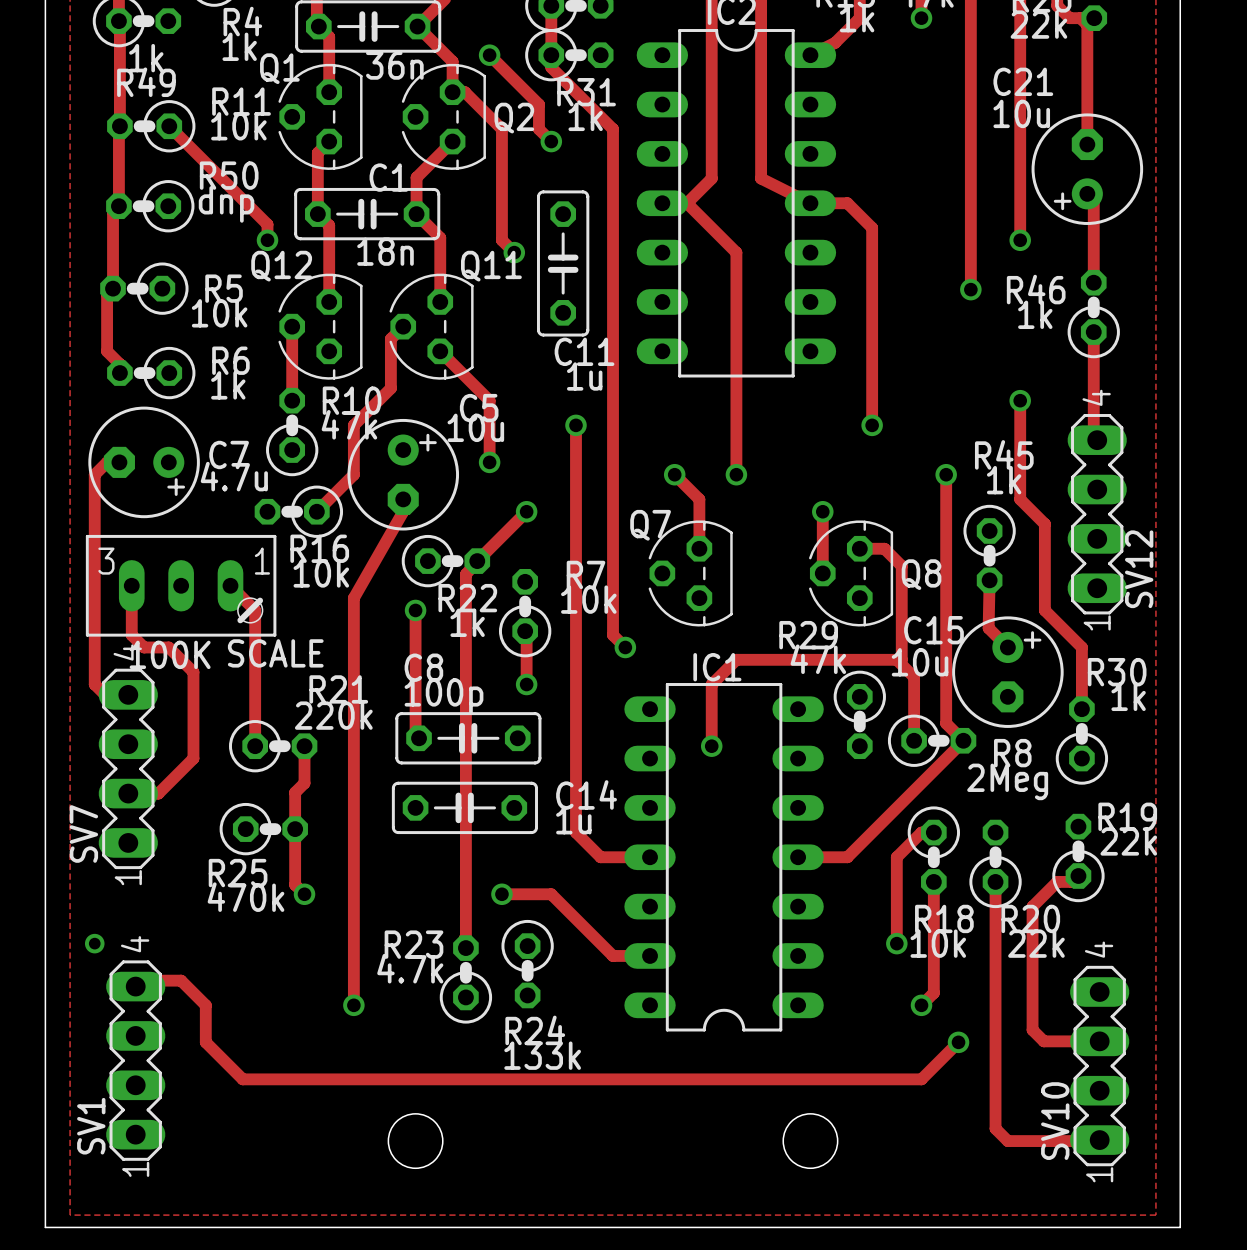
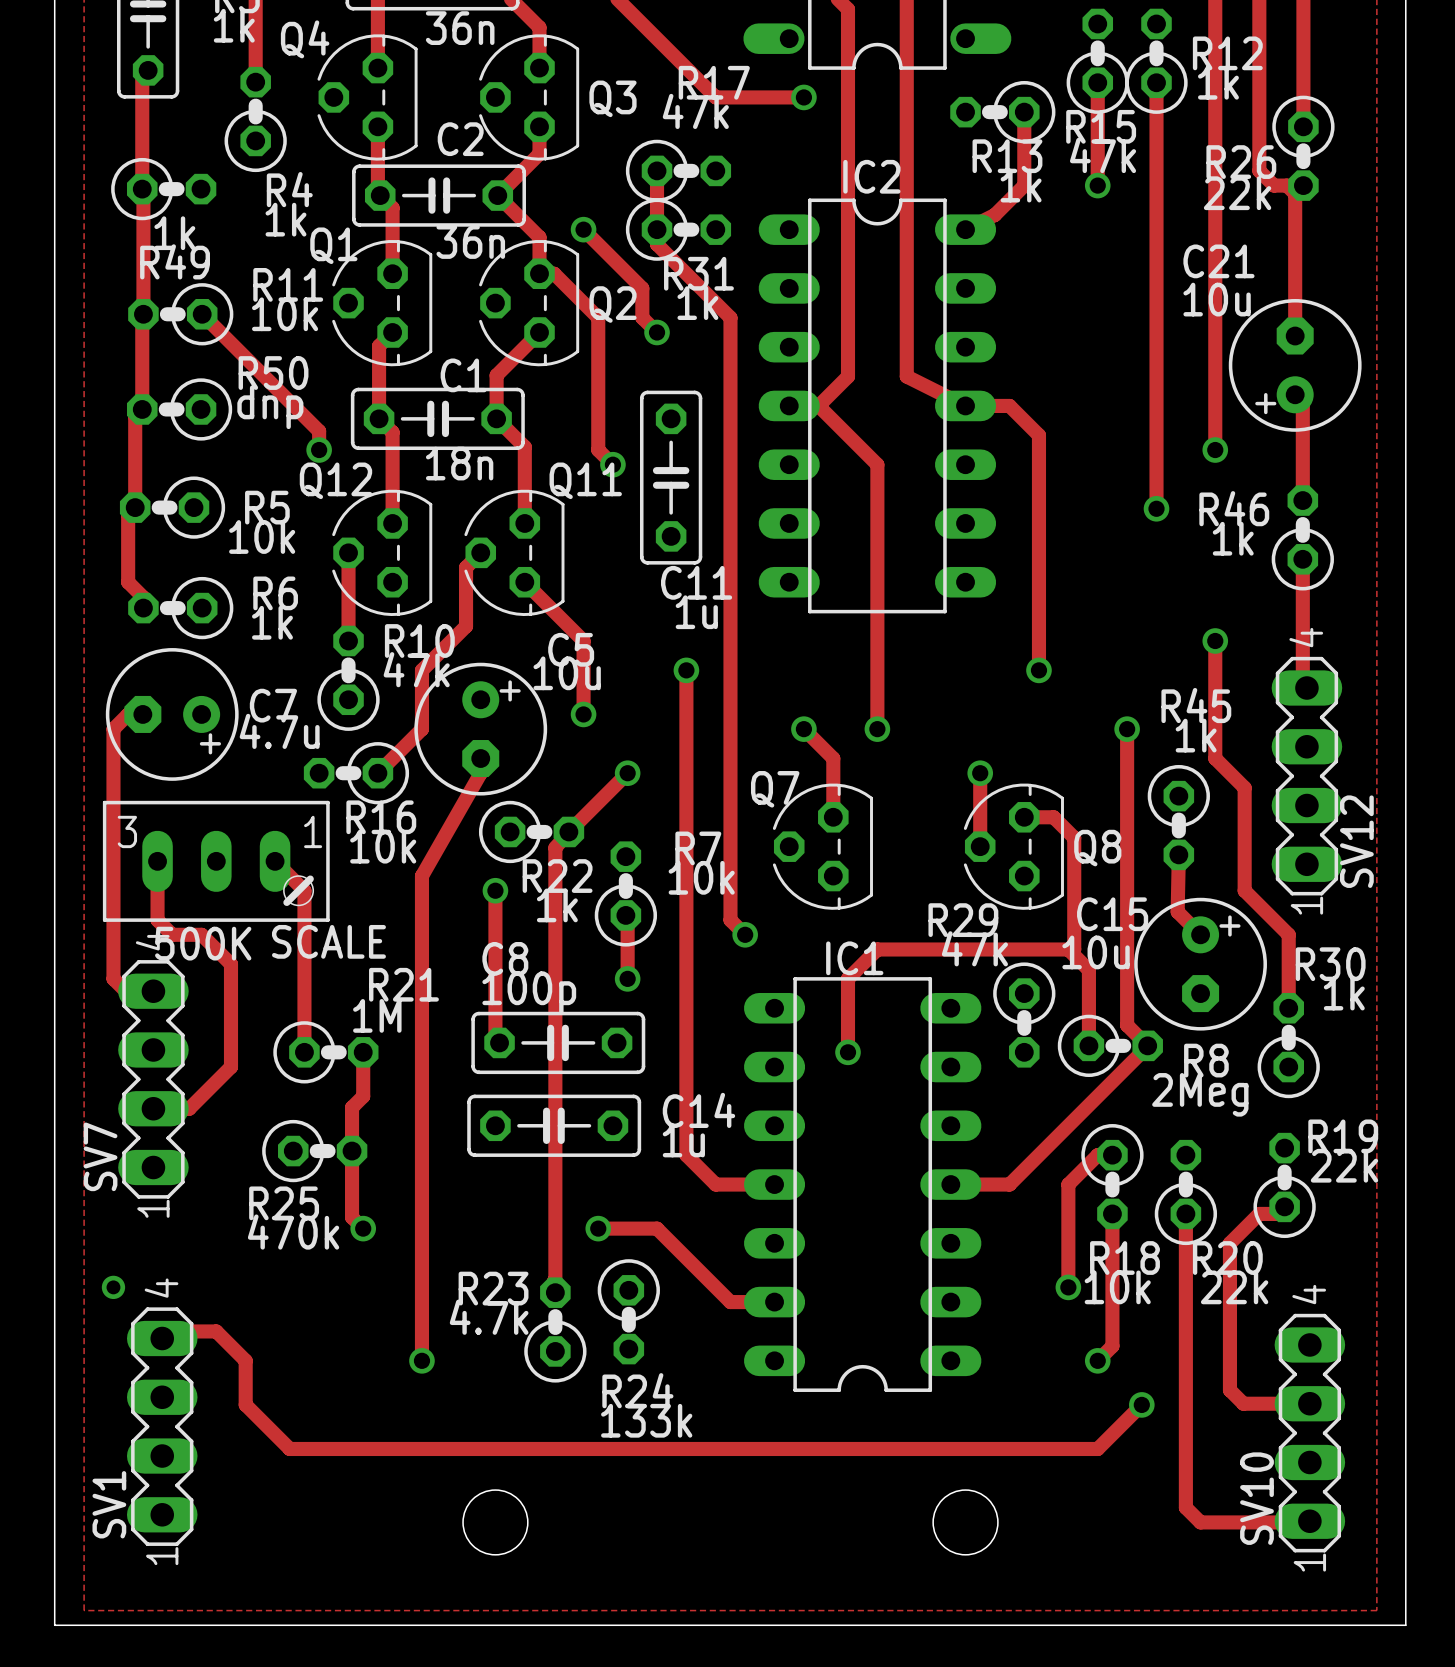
SCALE value: 100K (170, 654) -> 500K (203, 943)
R21 value: 220k (333, 715) -> 1M (377, 1015)

